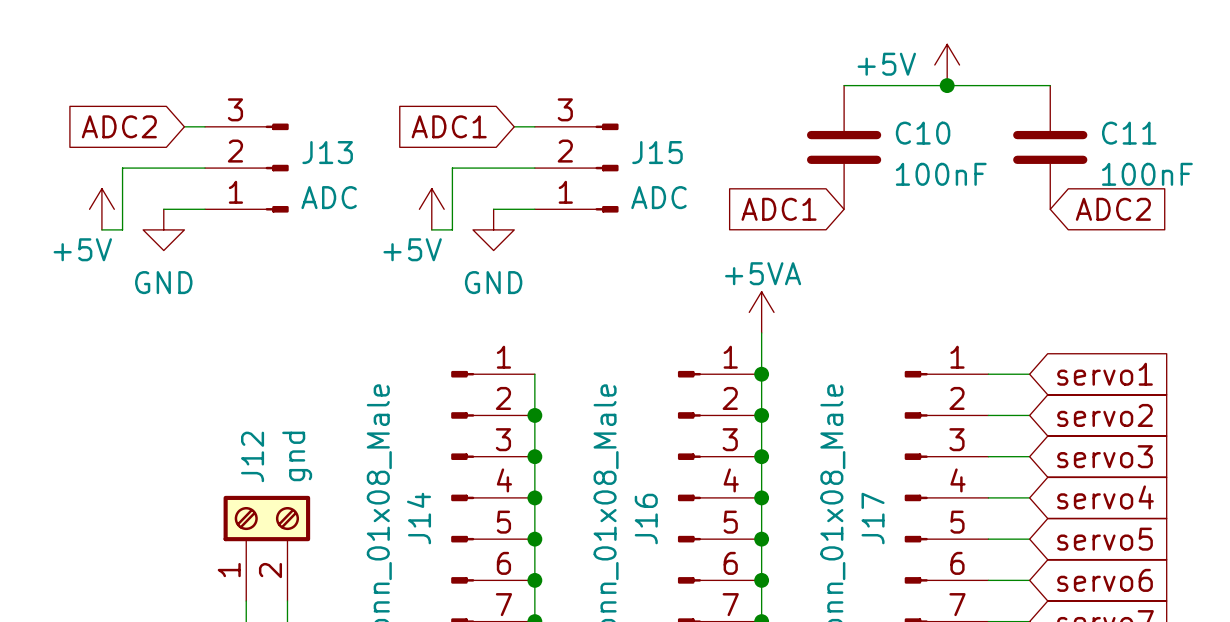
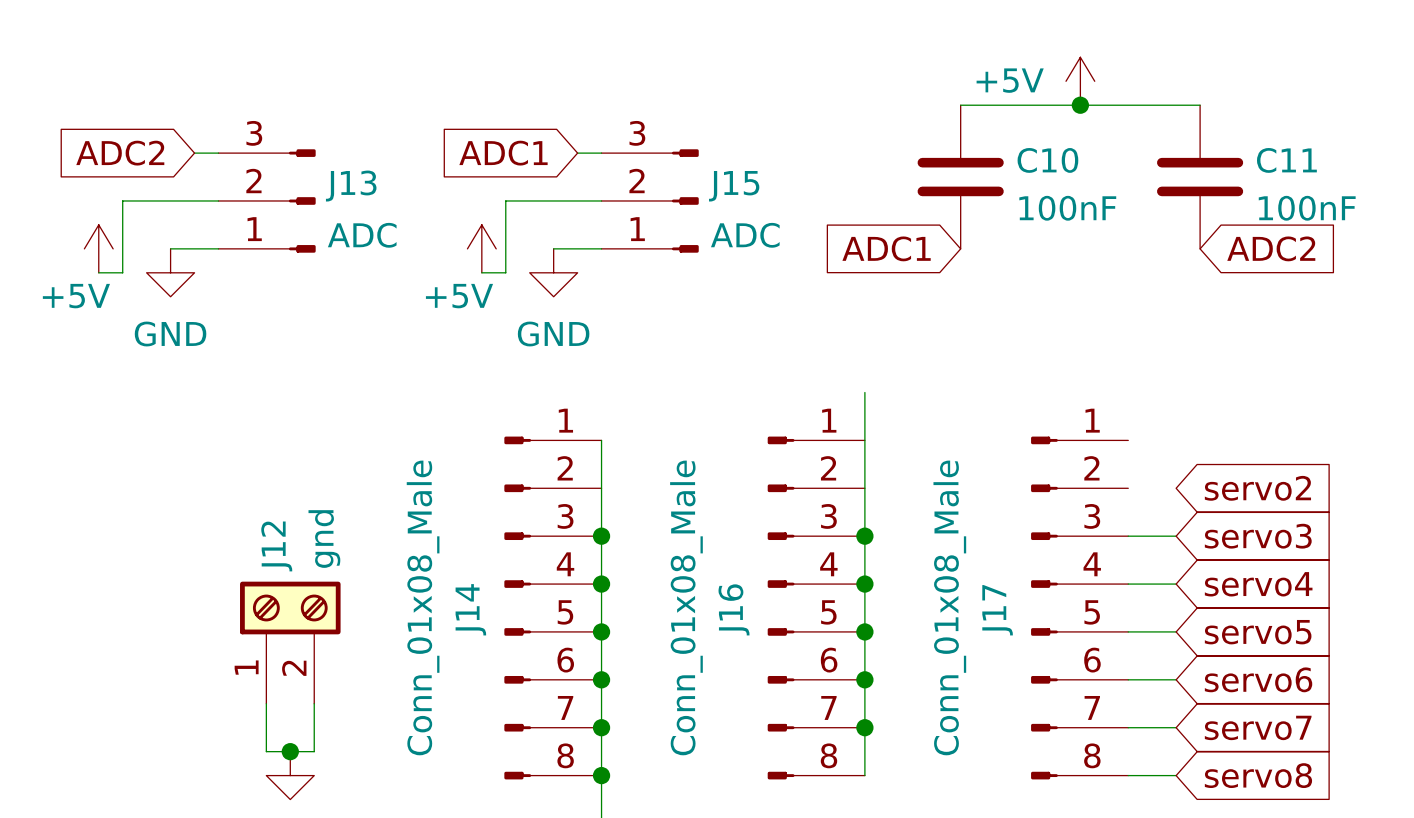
power symbol: +5VA (761, 312) -> none
junction: (761, 374) -> none
wire: (988, 374) (1029, 374) -> none
global label: servo1 (1105, 374) -> none
junction: (534, 415) -> none
junction: (761, 415) -> none
wire: (988, 415) (1029, 415) -> none

